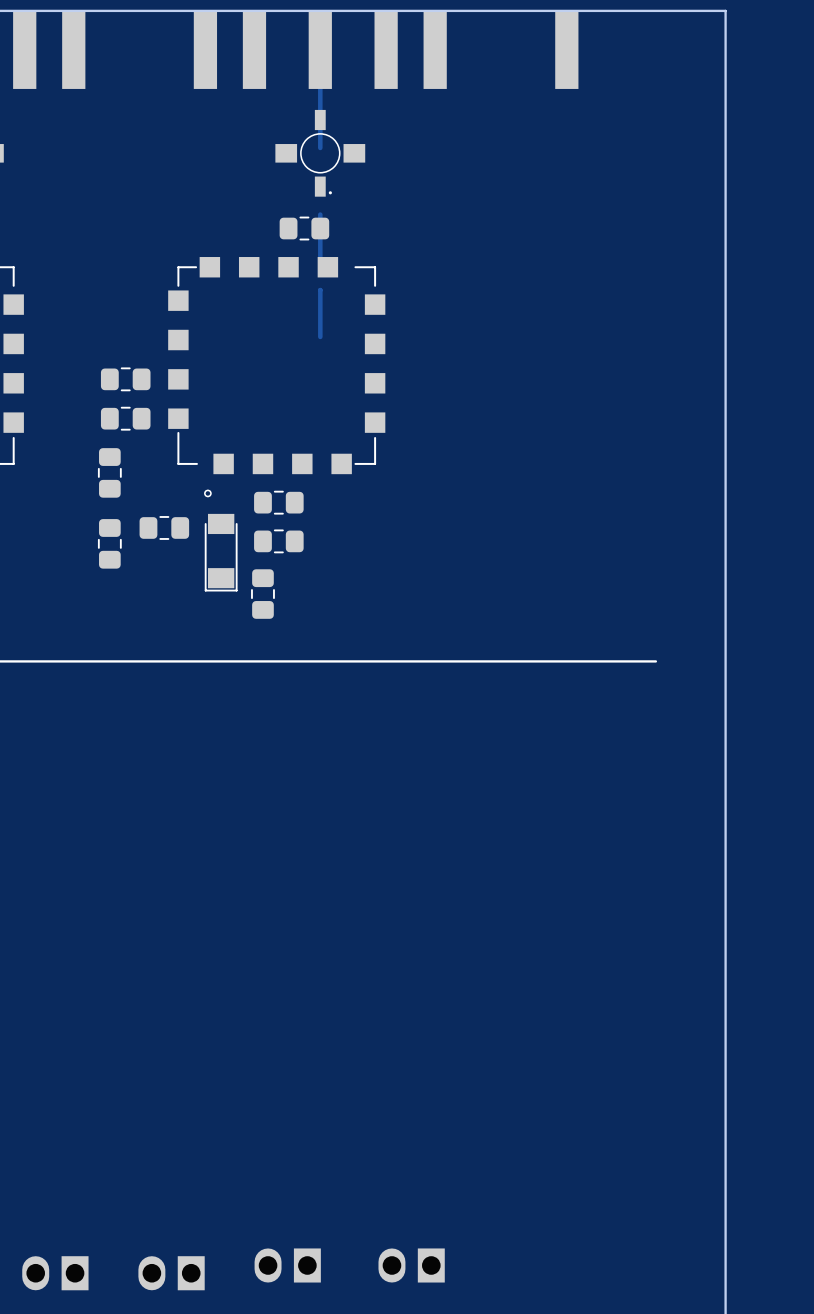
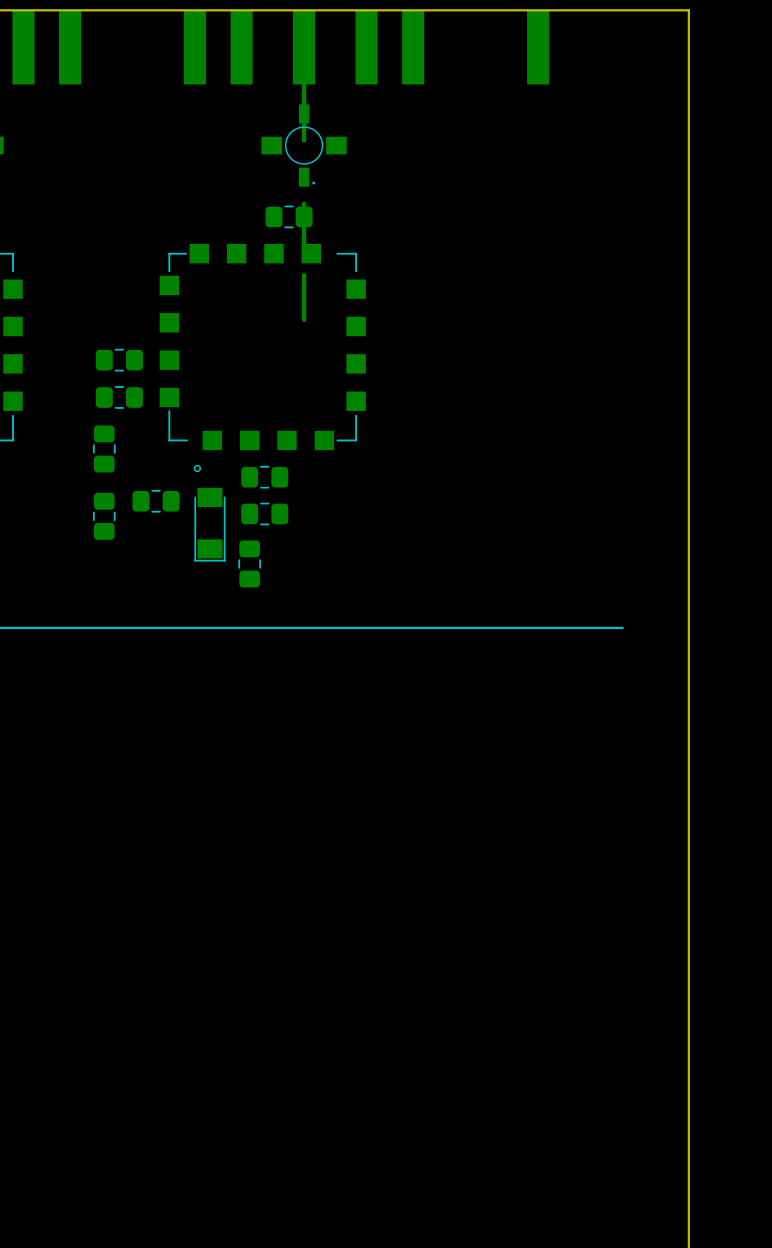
part: (287, 1265) -> none
part: (411, 1265) -> none
part: (55, 1273) -> none
part: (171, 1273) -> none

